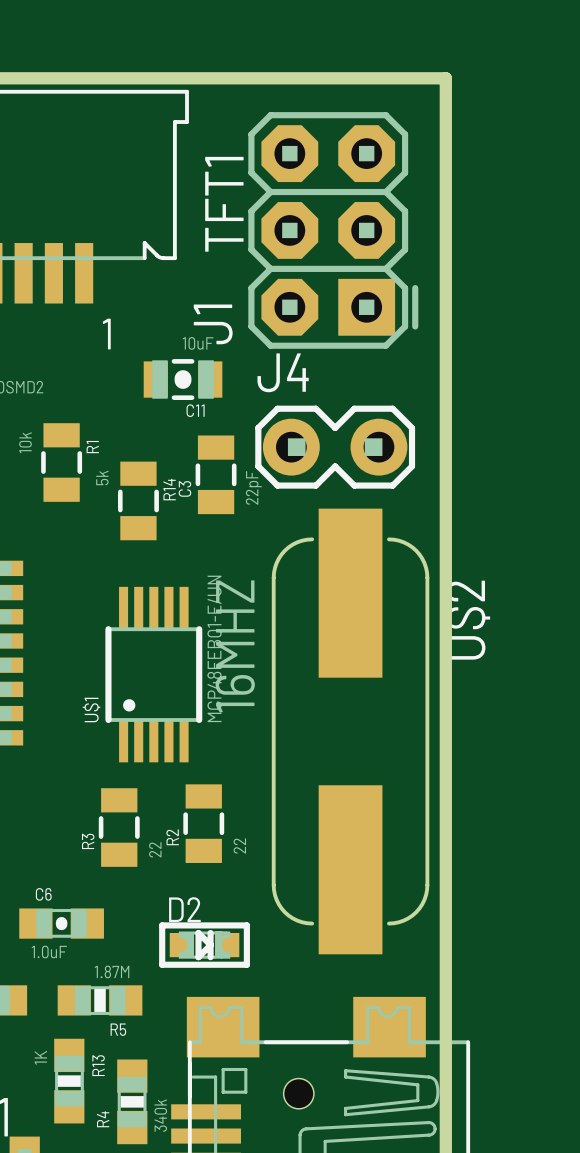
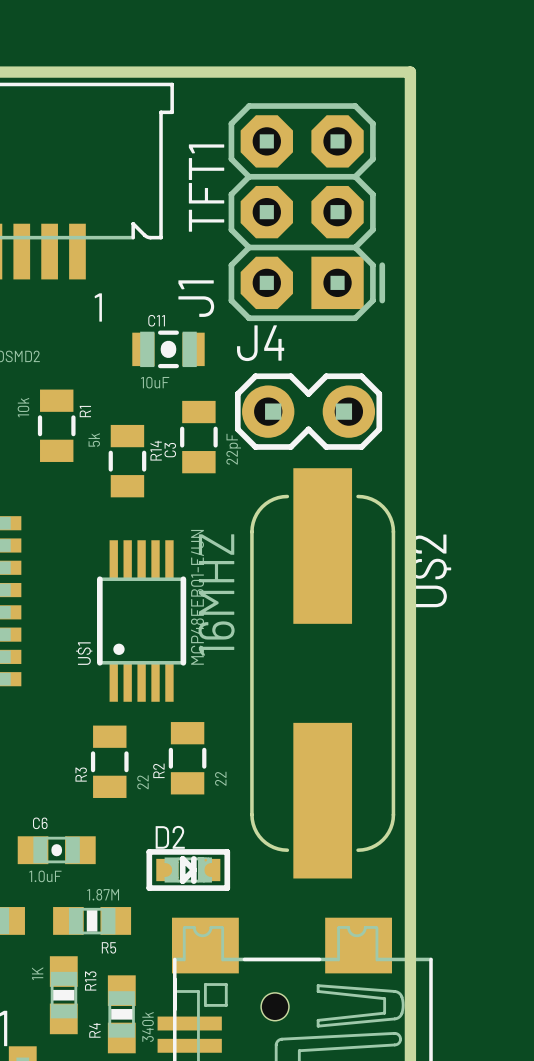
C11 value position: 10uF (198, 343) -> 10uF (155, 382)
C11 name position: C11 (195, 410) -> C11 (156, 320)

